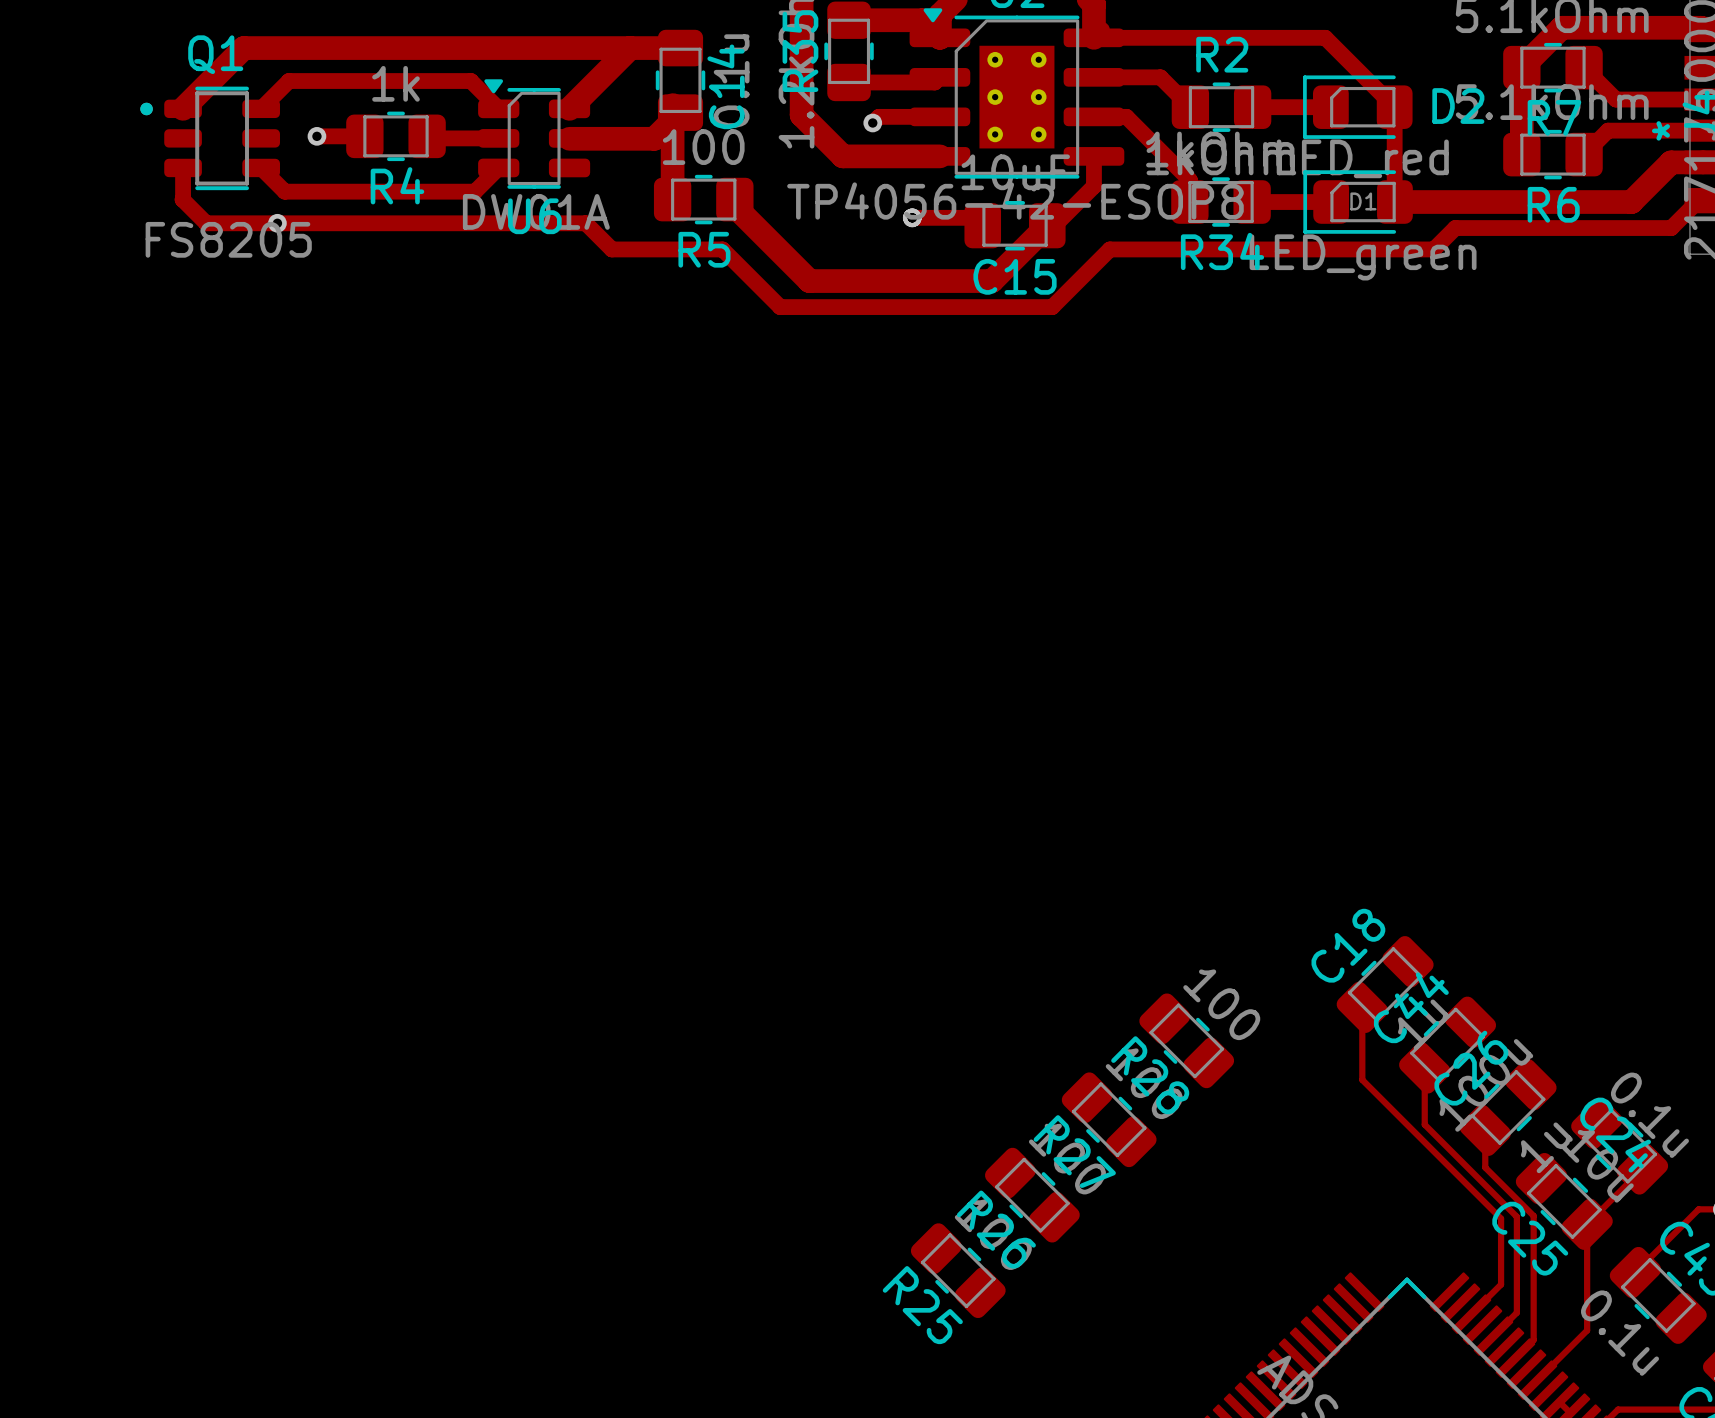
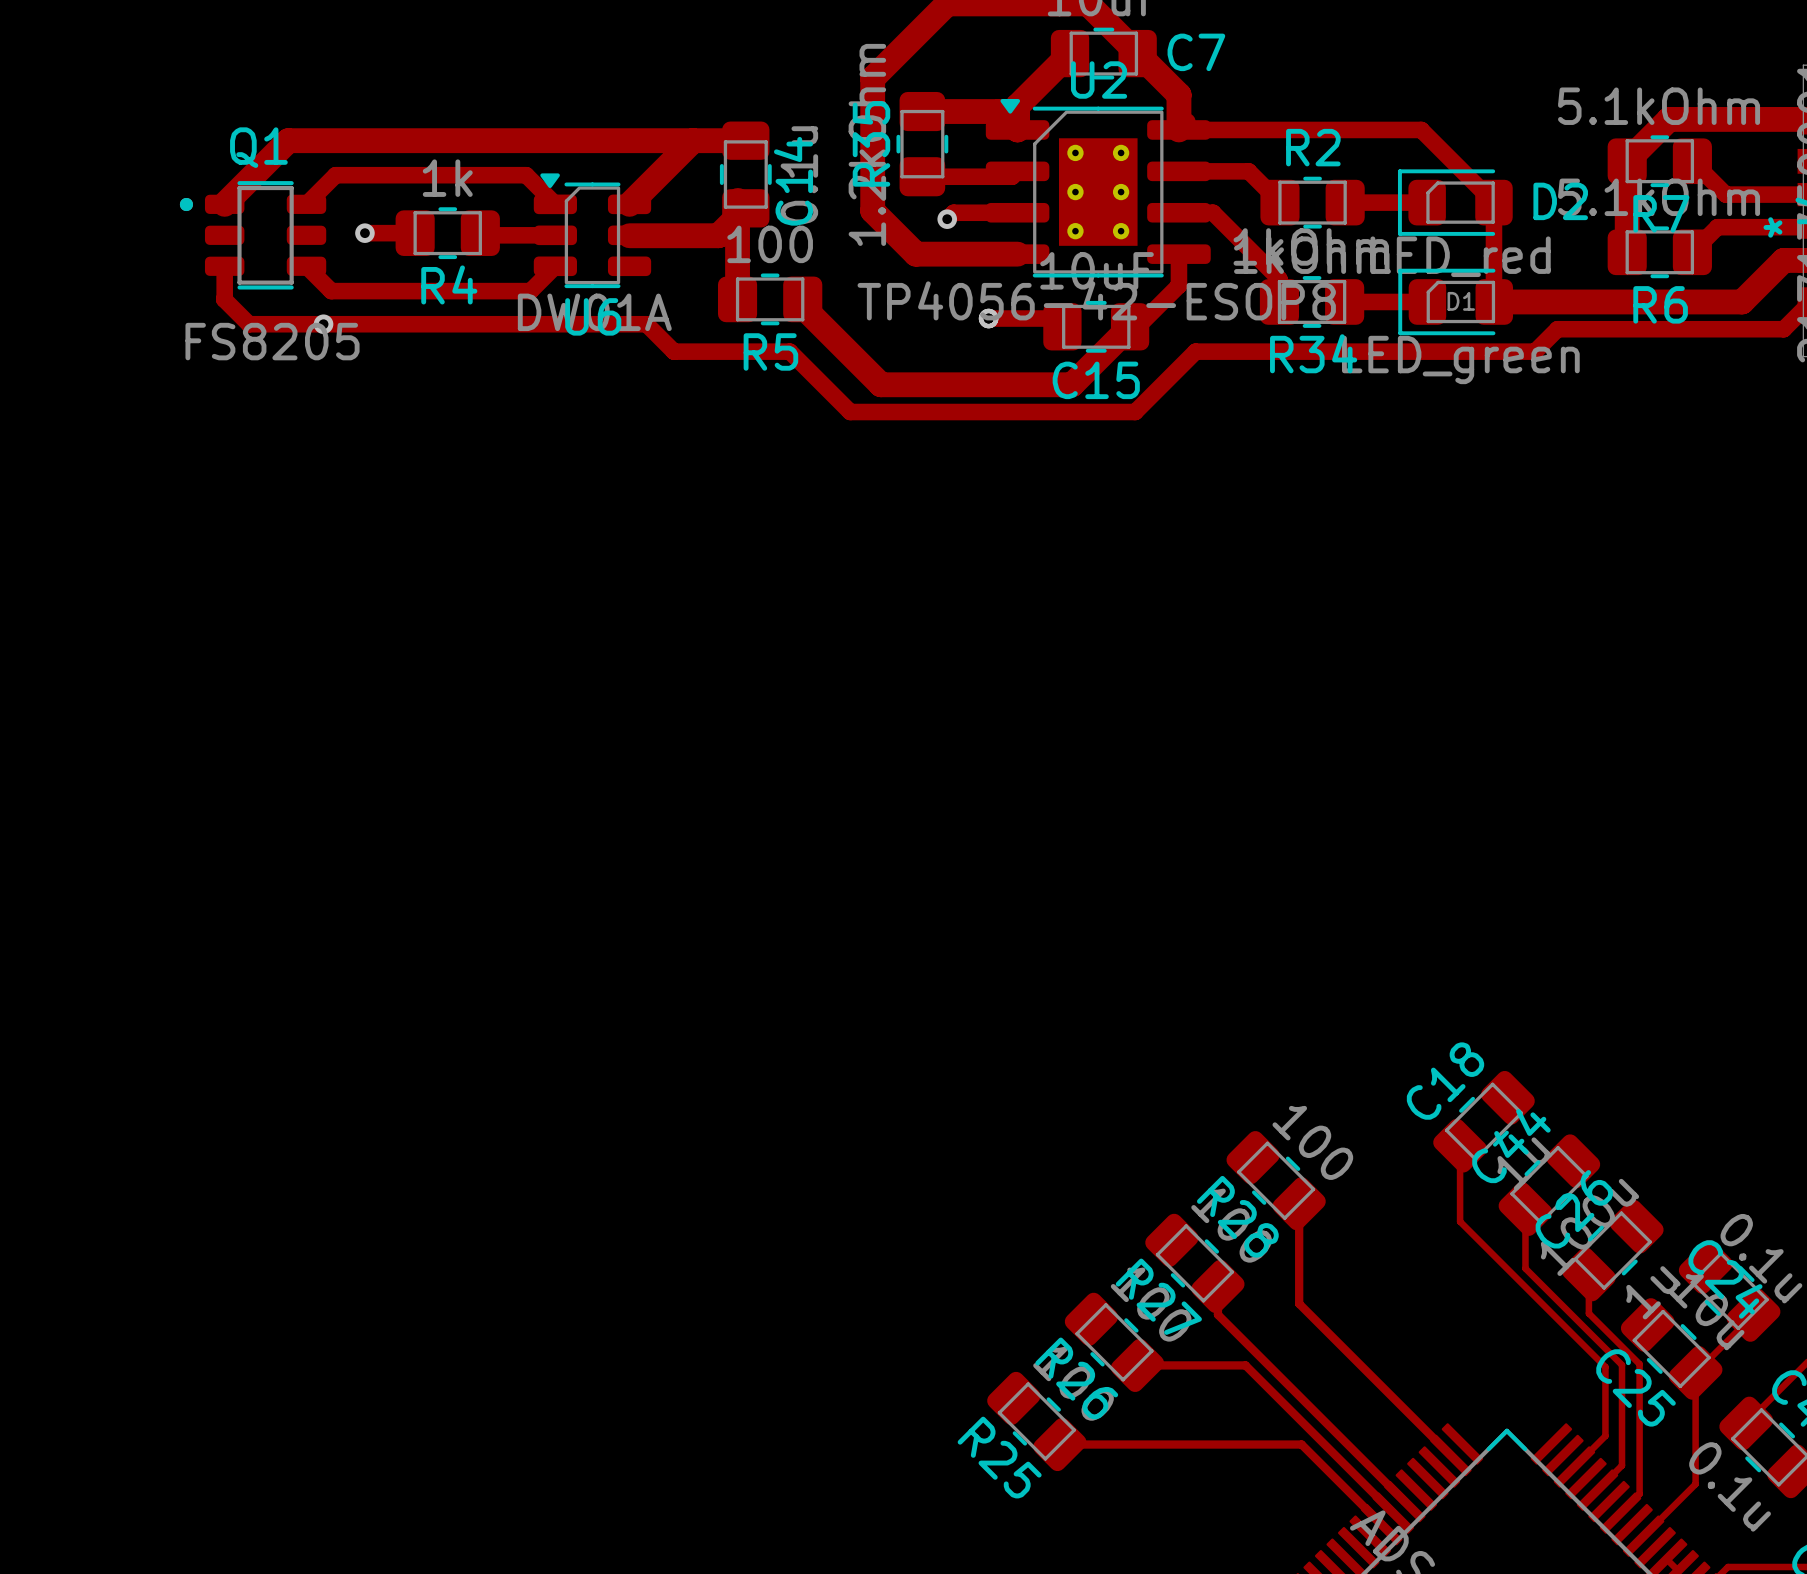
track: none -> (1299, 1203) (1299, 1303) (1450, 1455)
track: none -> (1217, 1286) (1217, 1314) (1404, 1501)
track: none -> (1137, 1365) (1245, 1365) (1393, 1513)
track: none -> (1059, 1444) (1301, 1444) (1381, 1524)

